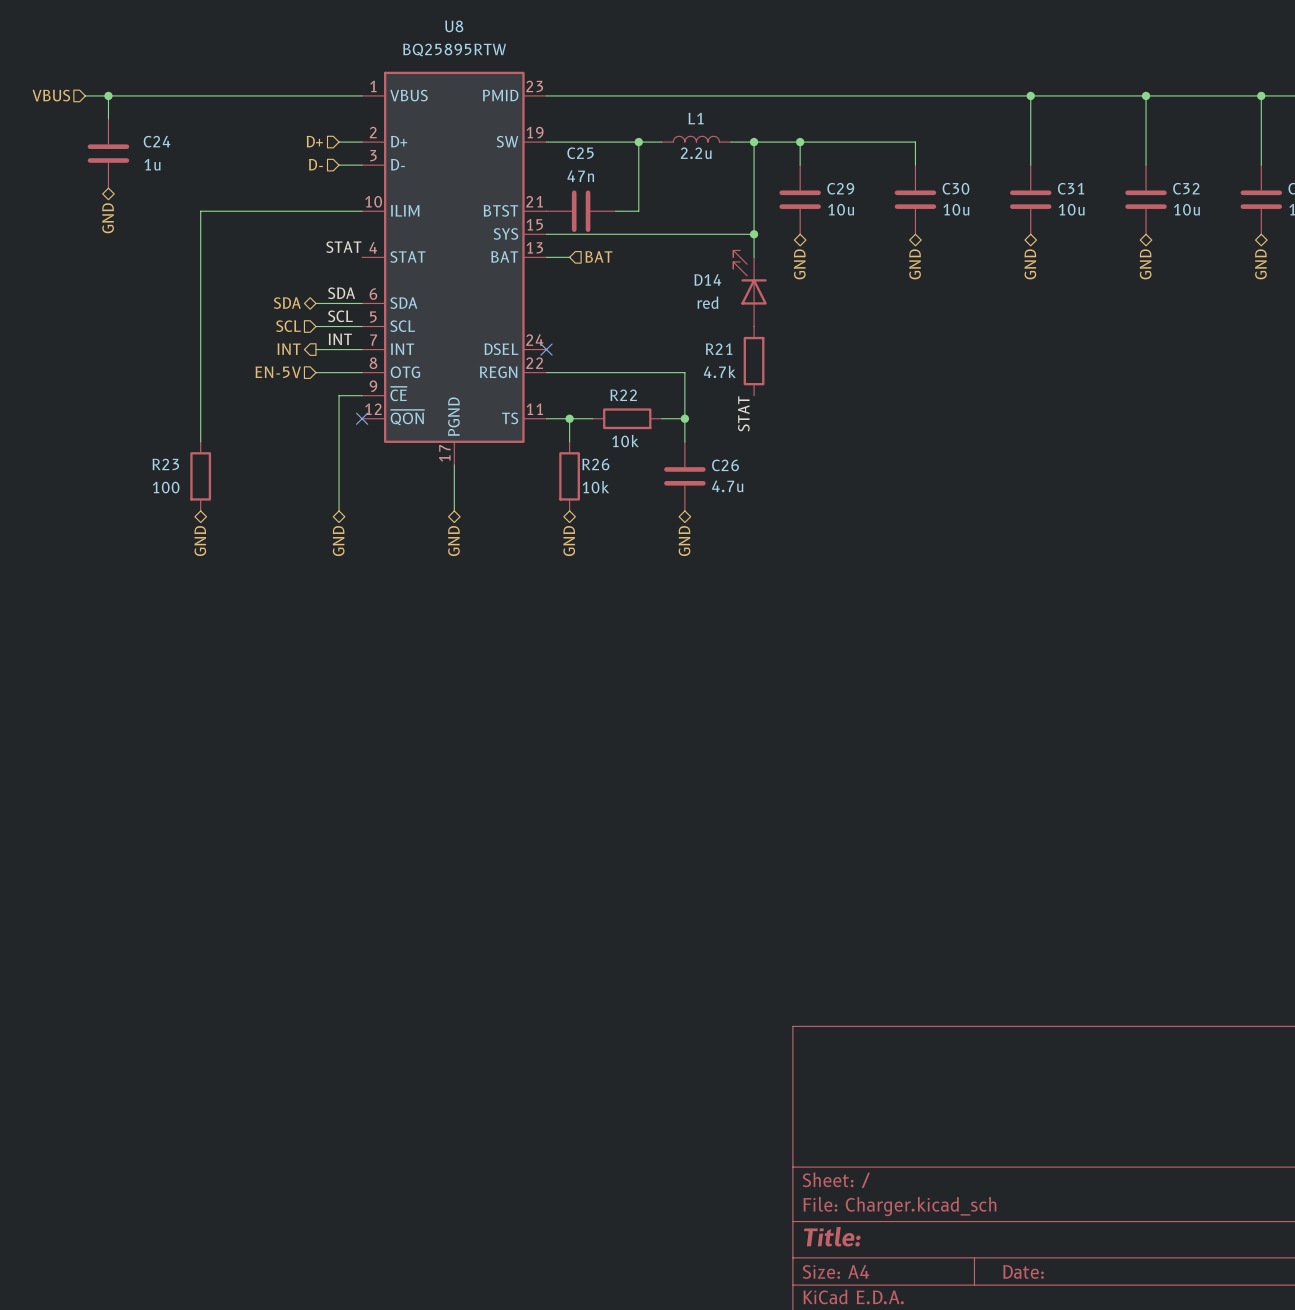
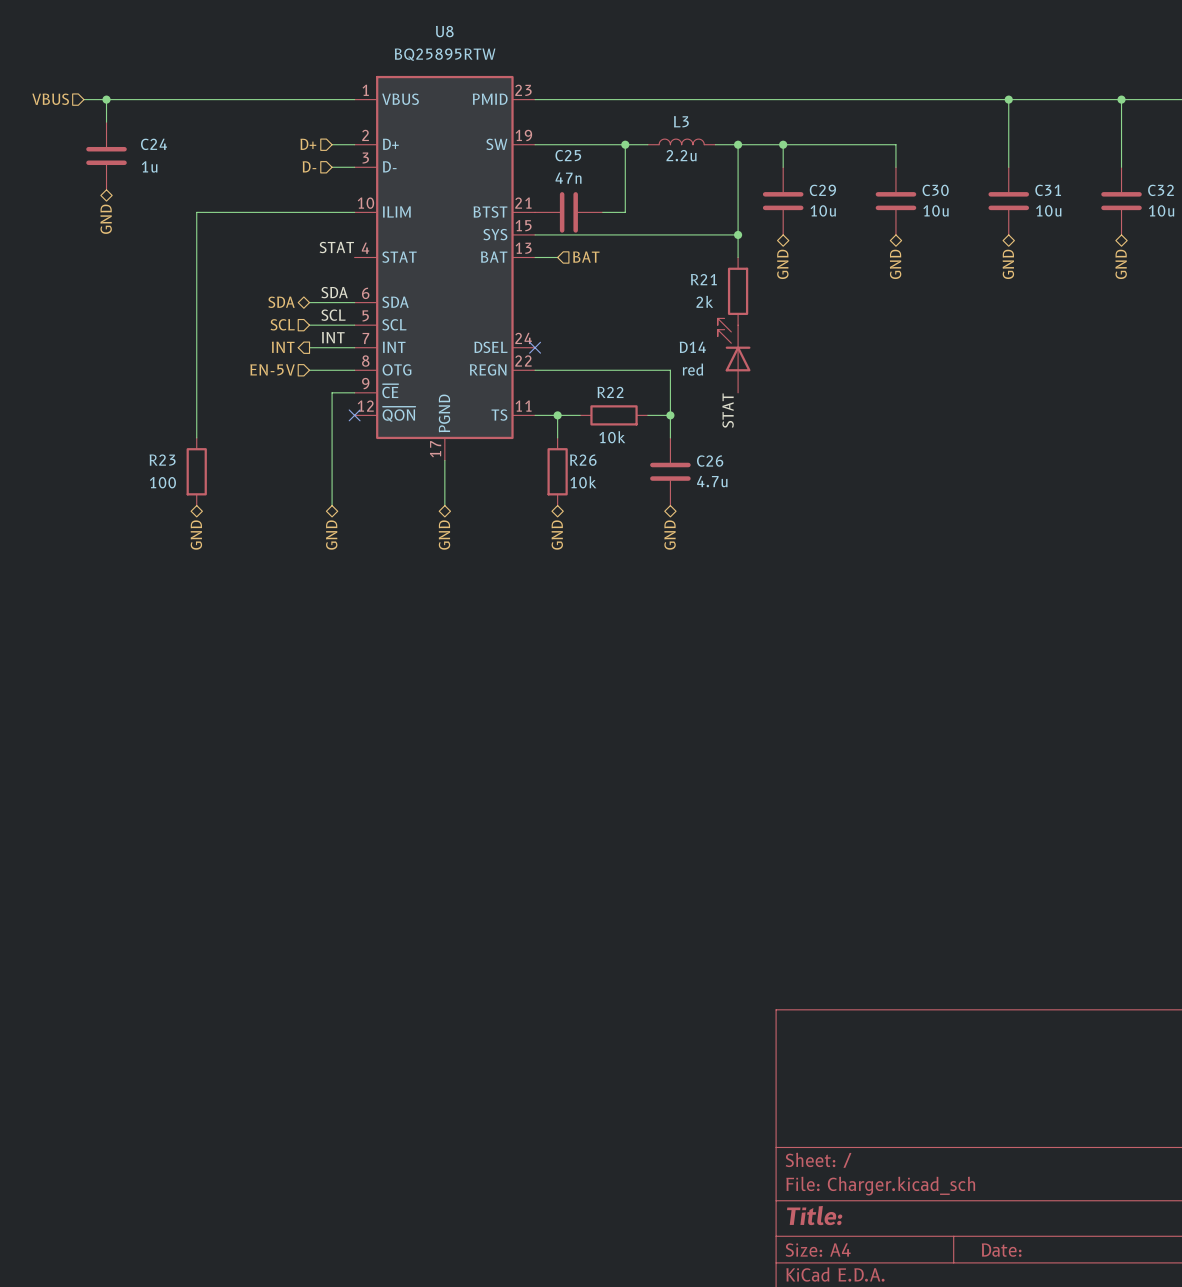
L1 name: L1 (696, 118) -> L3 (681, 121)
D14 position: (750, 288) -> (734, 355)
R21 position: (754, 361) -> (738, 291)
R21 value: 4.7k (719, 371) -> 2k (704, 301)

